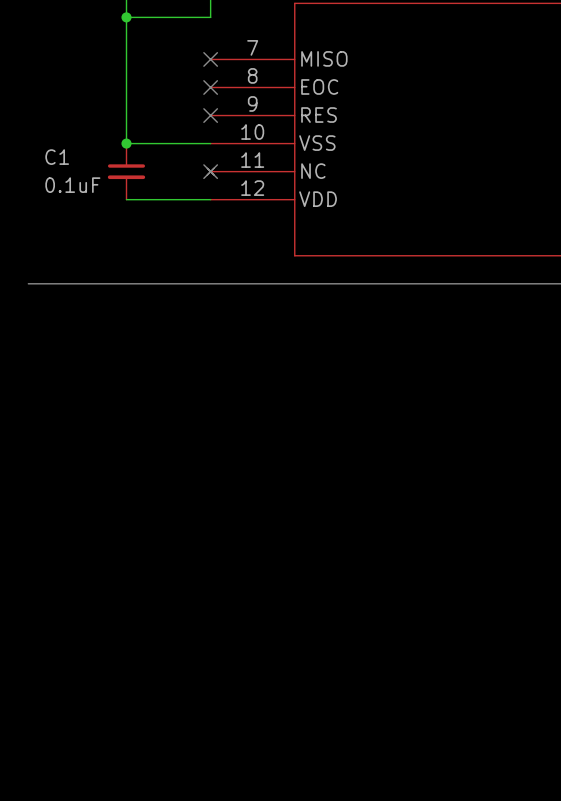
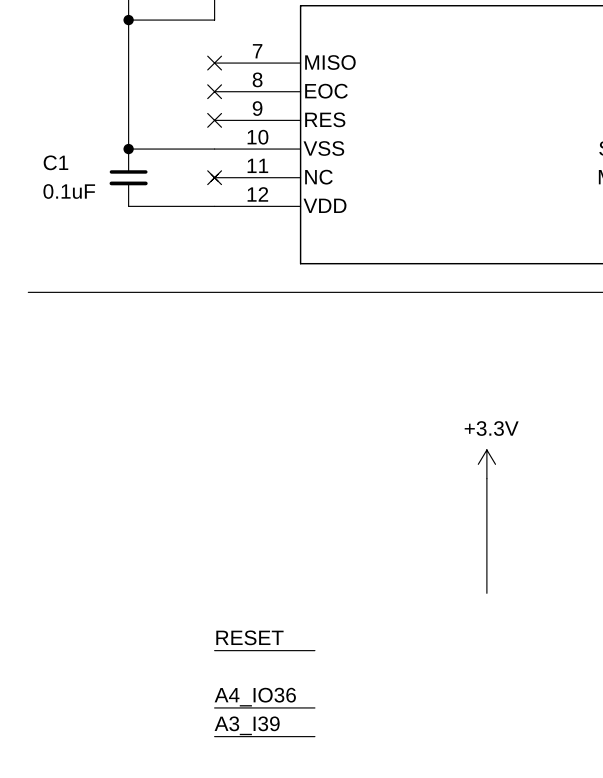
power symbol: none -> +3.3V (486, 464)
wire: none -> (486, 478) (486, 593)
label: none -> RESET (249, 637)
wire: none -> (214, 650) (314, 650)
label: none -> A4_IO36 (255, 697)
wire: none -> (214, 707) (314, 707)
label: none -> A3_I39 (247, 725)
wire: none -> (214, 736) (314, 736)

